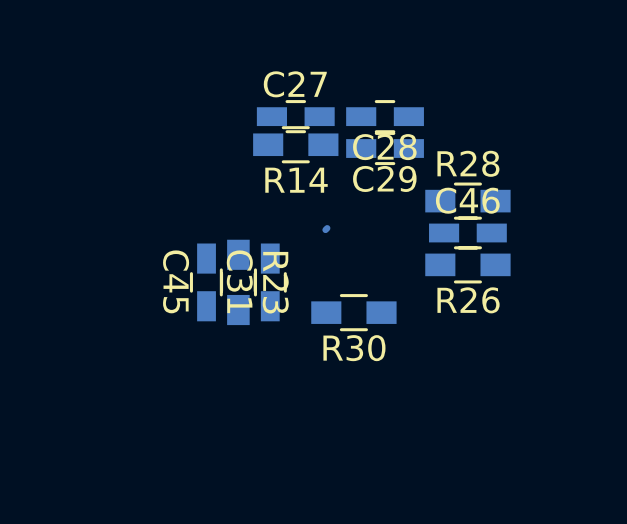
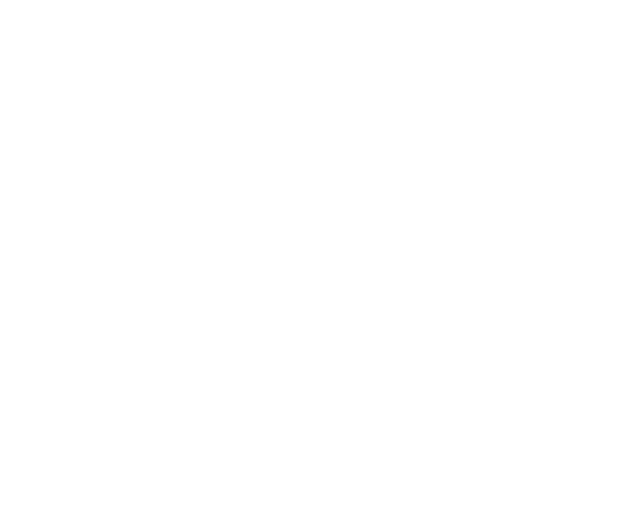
C27: (295, 116) -> none
C28: (385, 116) -> none
R14: (295, 144) -> none
C29: (385, 148) -> none
R28: (467, 201) -> none
bottom track: (327, 228) (325, 229) -> none
C46: (467, 232) -> none
R26: (467, 264) -> none
C45: (206, 282) -> none
R23: (238, 282) -> none
C31: (270, 282) -> none
R30: (353, 312) -> none

